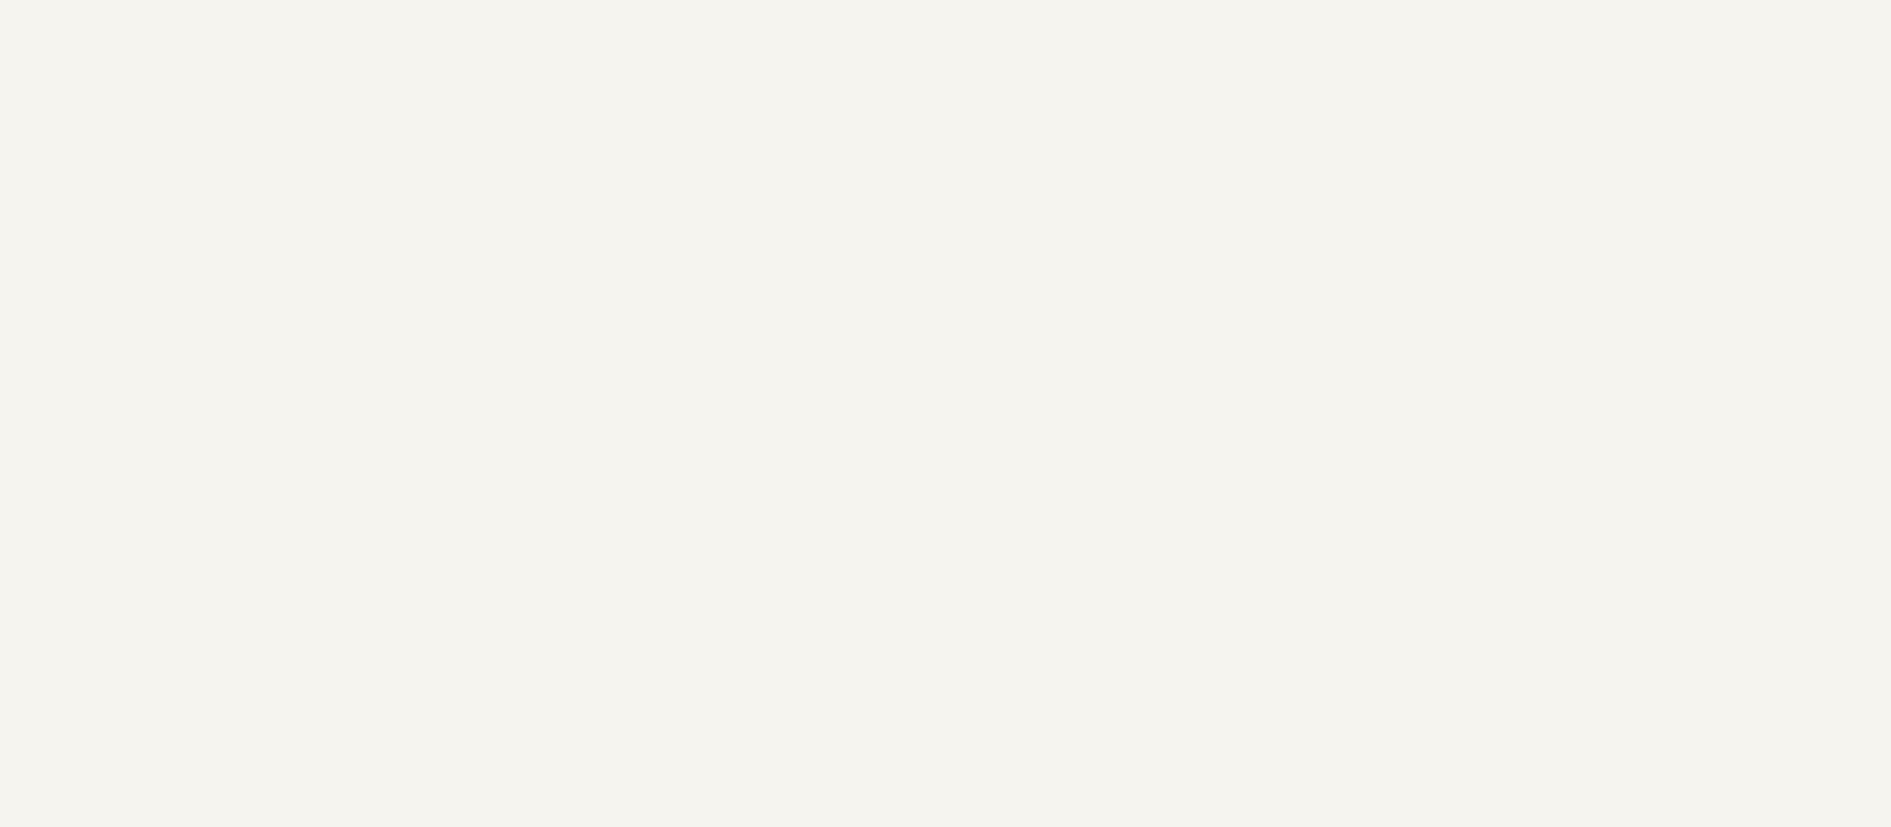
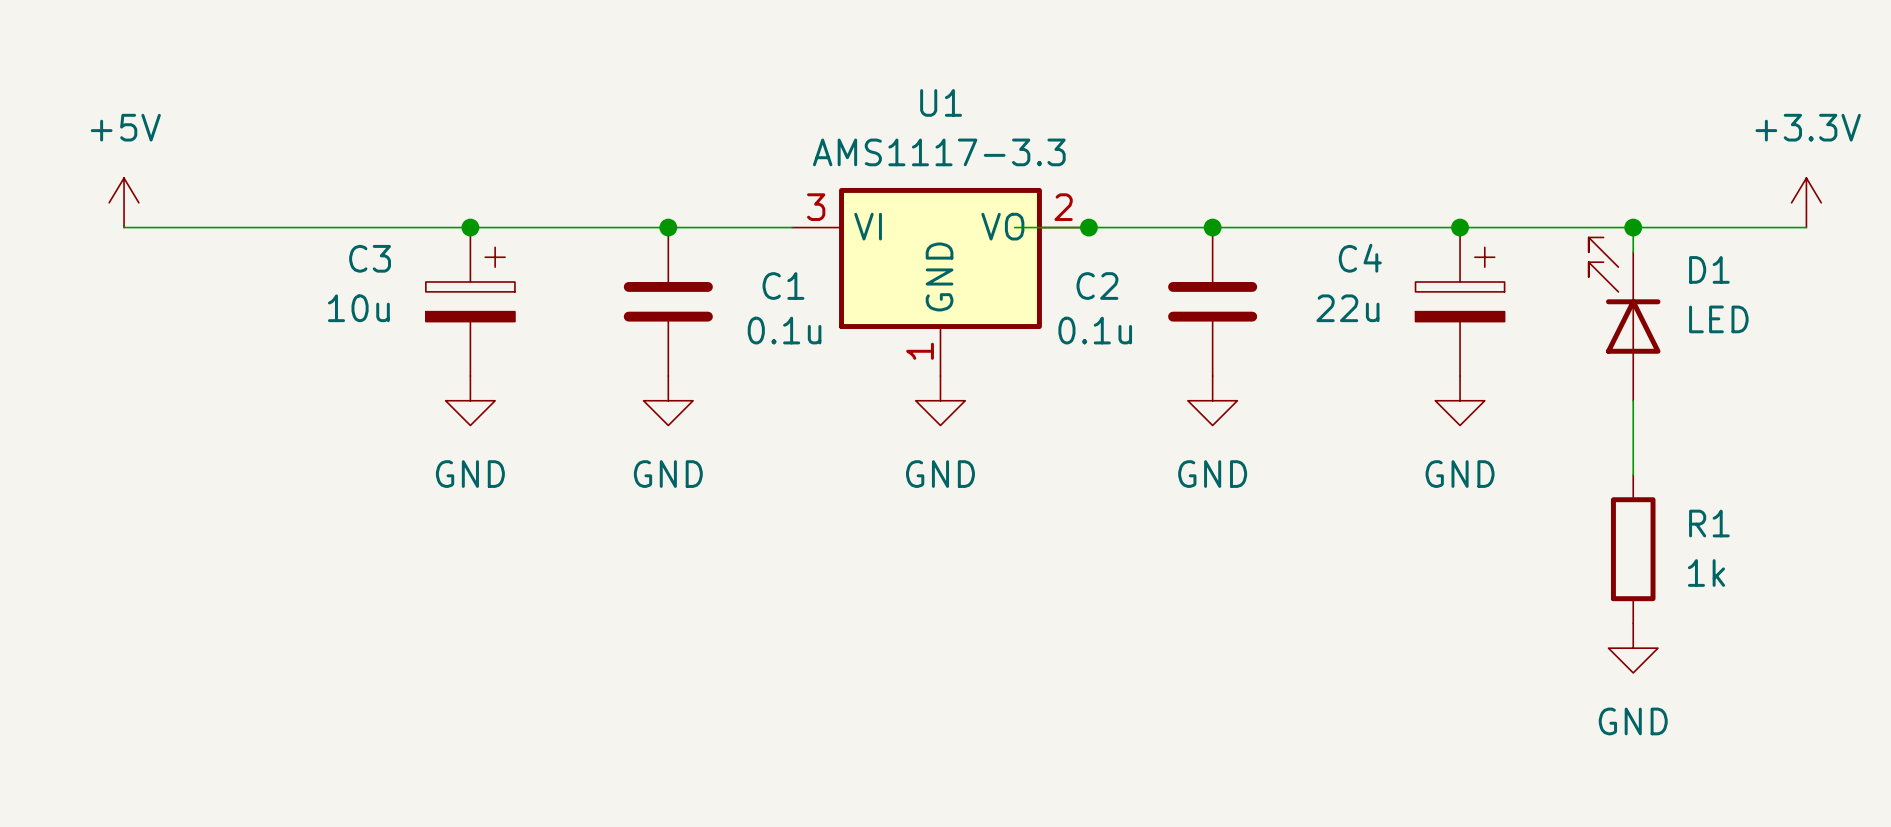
power symbol: none -> +5V (124, 202)
power symbol: none -> +3.3V (1806, 202)
wire: none -> (124, 227) (792, 227)
junction: none -> (470, 227)
junction: none -> (668, 227)
wire: none -> (1014, 227) (1806, 227)
junction: none -> (1088, 227)
junction: none -> (1212, 227)
junction: none -> (1460, 227)
wire: none -> (1633, 227) (1633, 252)
junction: none -> (1633, 227)
U1: none -> AMS1117-3.3 (940, 281)
C3: none -> 10u (470, 301)
C1: none -> 0.1u (668, 301)
C2: none -> 0.1u (1212, 301)
C4: none -> 22u (1460, 301)
D1: none -> LED (1624, 319)
power symbol: none -> GND (470, 400)
power symbol: none -> GND (668, 400)
power symbol: none -> GND (940, 400)
power symbol: none -> GND (1212, 400)
power symbol: none -> GND (1460, 400)
wire: none -> (1633, 400) (1633, 474)
R1: none -> 1k (1633, 549)
power symbol: none -> GND (1633, 648)

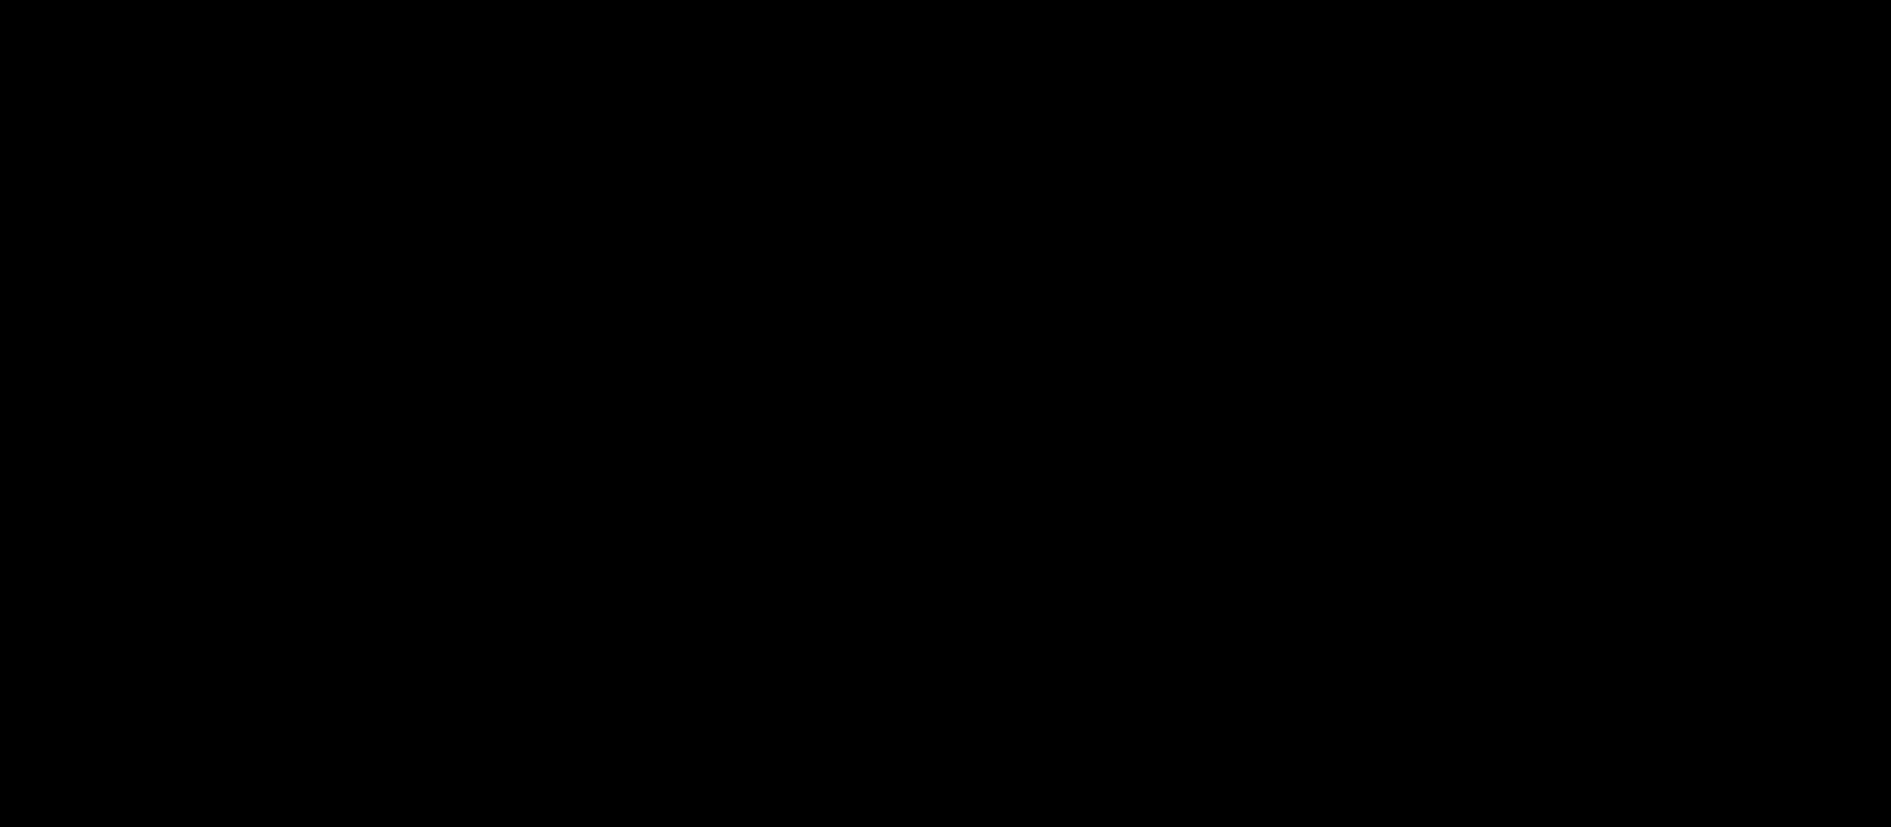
power symbol: +5V (124, 202) -> none
power symbol: +3.3V (1806, 202) -> none
wire: (124, 227) (792, 227) -> none
junction: (470, 227) -> none
junction: (668, 227) -> none
wire: (1014, 227) (1806, 227) -> none
junction: (1088, 227) -> none
junction: (1212, 227) -> none
junction: (1460, 227) -> none
wire: (1633, 227) (1633, 252) -> none
junction: (1633, 227) -> none
U1: AMS1117-3.3 (940, 281) -> none
C3: 10u (470, 301) -> none
C1: 0.1u (668, 301) -> none
C2: 0.1u (1212, 301) -> none
C4: 22u (1460, 301) -> none
D1: LED (1624, 319) -> none
power symbol: GND (470, 400) -> none
power symbol: GND (668, 400) -> none
power symbol: GND (940, 400) -> none
power symbol: GND (1212, 400) -> none
power symbol: GND (1460, 400) -> none
wire: (1633, 400) (1633, 474) -> none
R1: 1k (1633, 549) -> none
power symbol: GND (1633, 648) -> none

